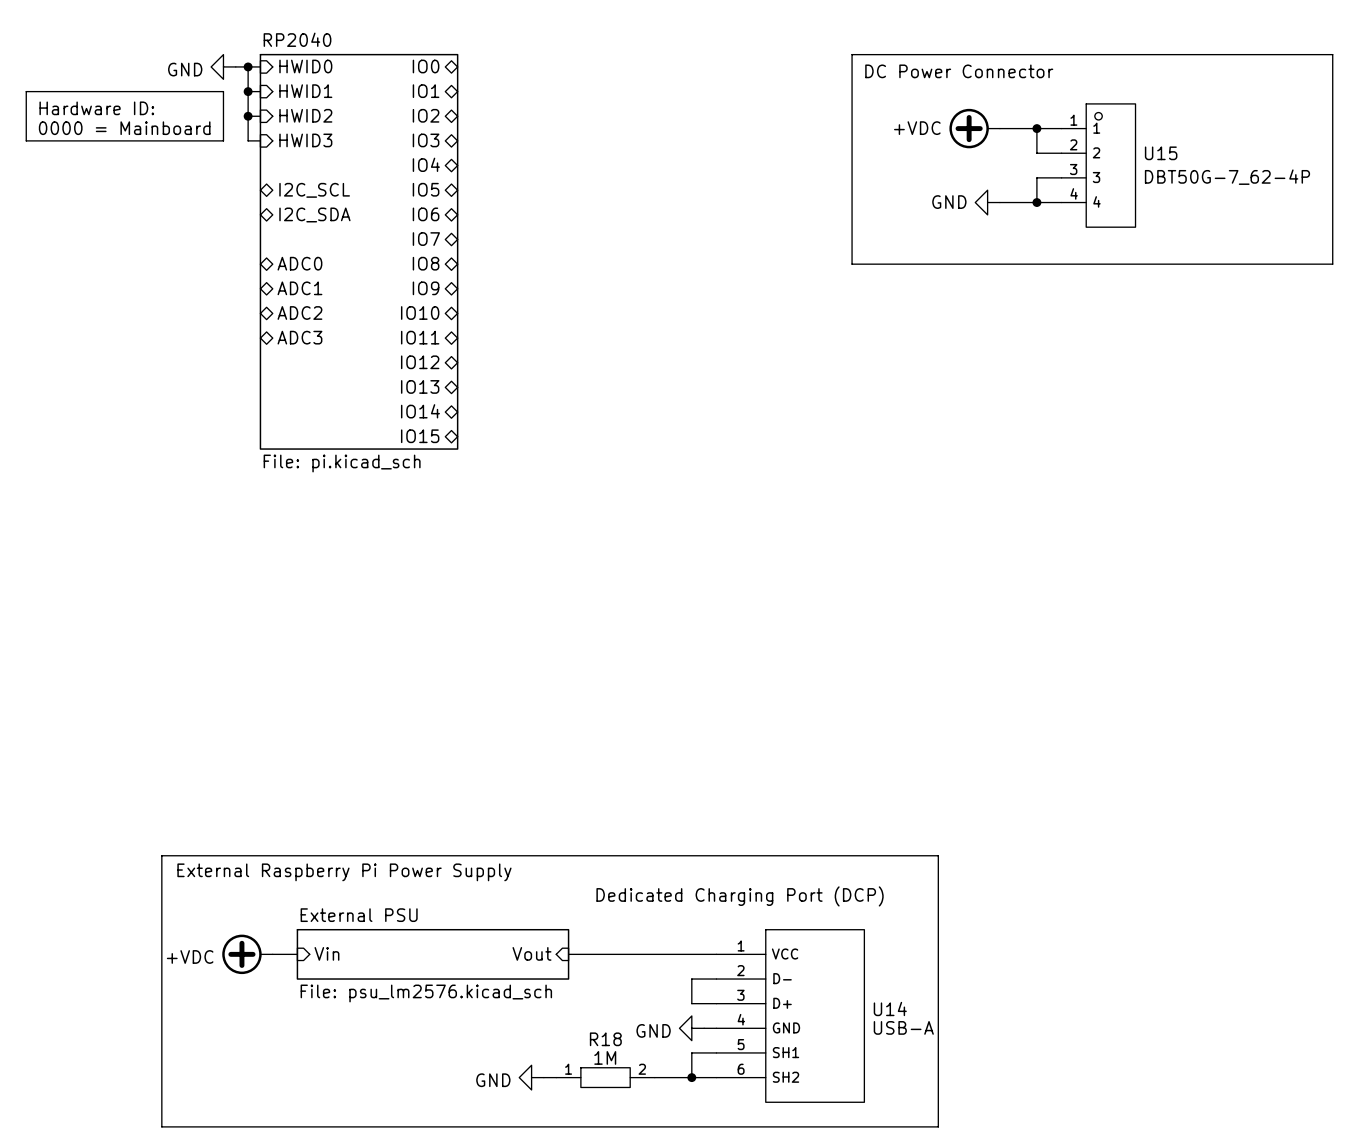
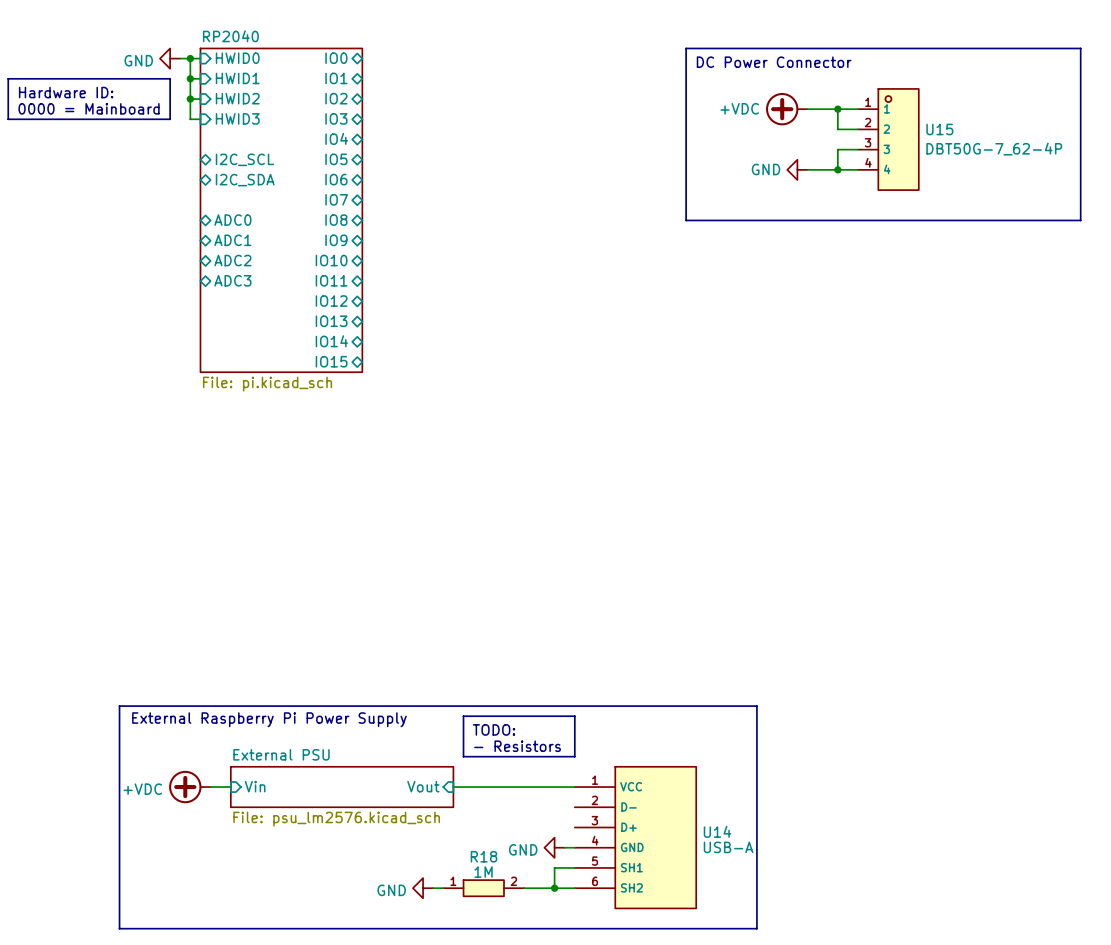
line: none -> (463, 716) (574, 716) (574, 756) (463, 756) (463, 716)
text: none -> TODO: (493, 729)
text: Dedicated Charging Port (DCP) (740, 896) -> - Resistors (517, 746)
wire: (716, 979) (691, 979) (691, 1003) (716, 1003) -> none

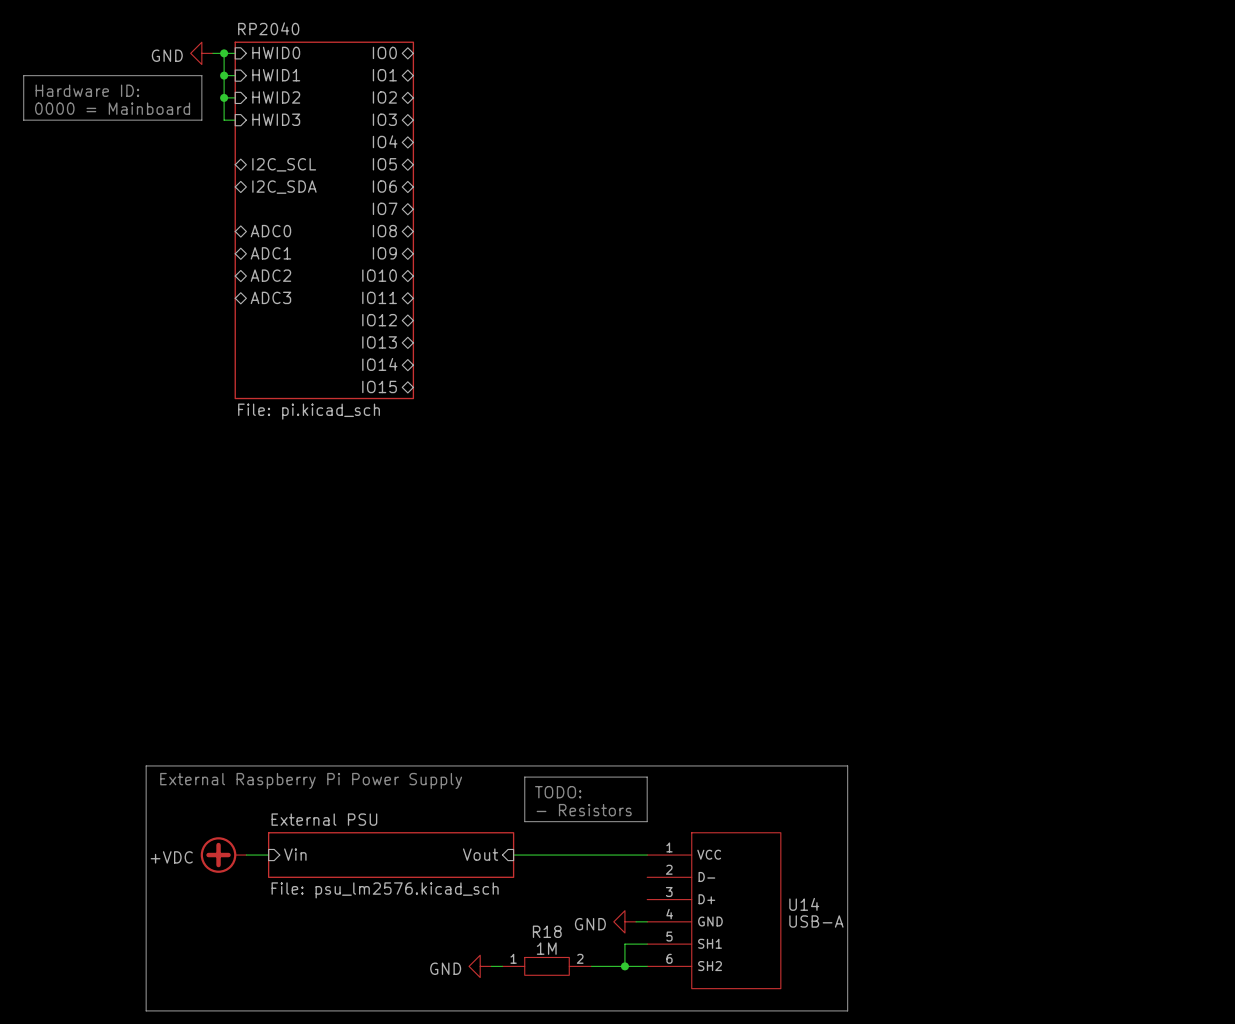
line: (686, 48) (1080, 48) (1080, 220) (686, 220) (686, 48) -> none
text: DC Power Connector (774, 62) -> none
power symbol: +VDC (786, 109) -> none
wire: (807, 109) (858, 109) -> none
wire: (837, 109) (837, 129) (858, 129) -> none
junction: (837, 109) -> none
U15: DBT50G-7_62-4P (888, 139) -> none
wire: (858, 149) (837, 149) (837, 169) -> none
power symbol: GND (797, 169) -> none
wire: (807, 169) (858, 169) -> none
junction: (837, 169) -> none

